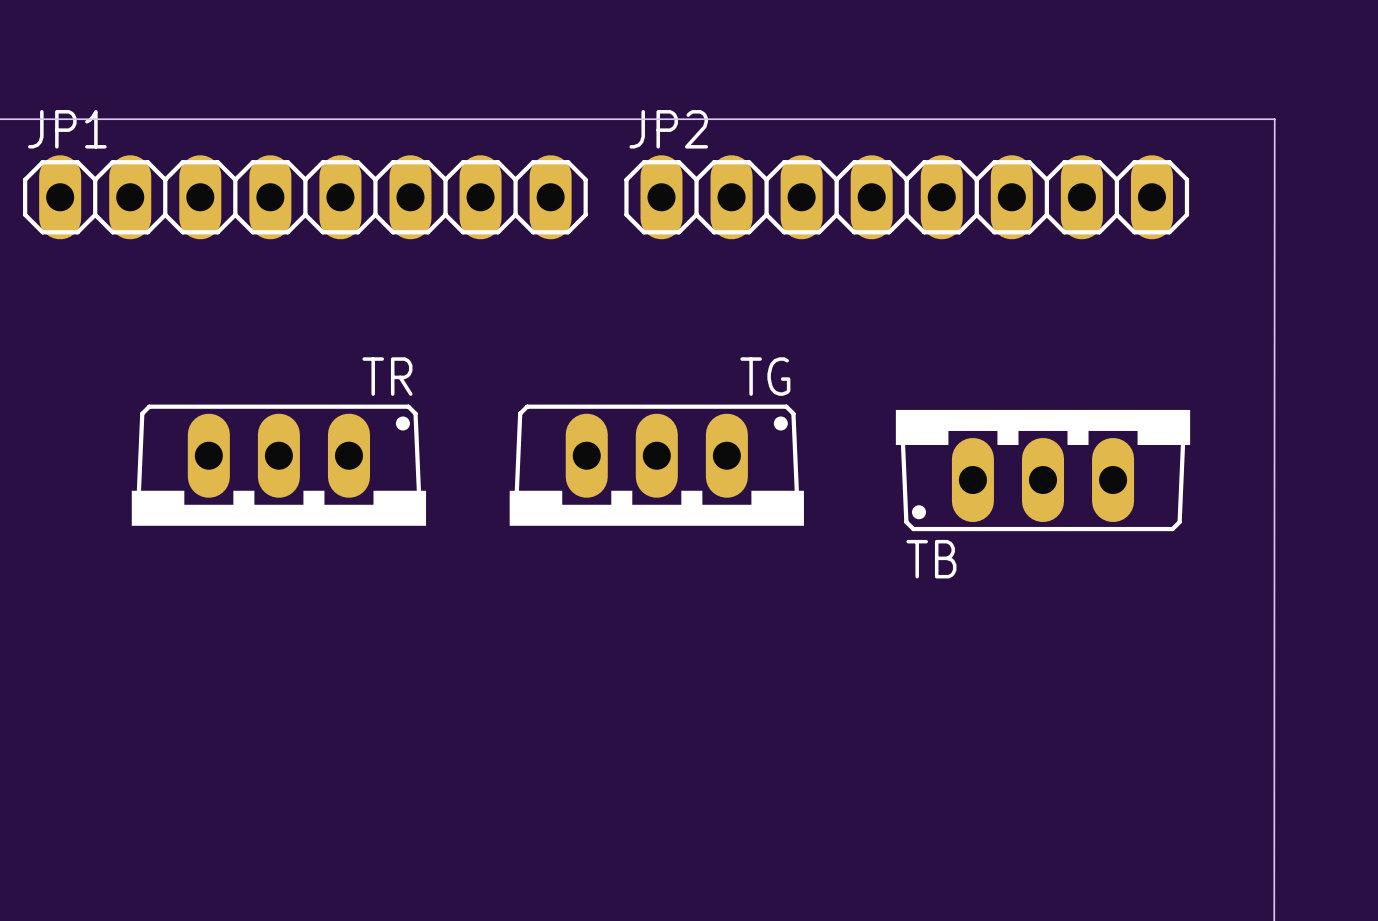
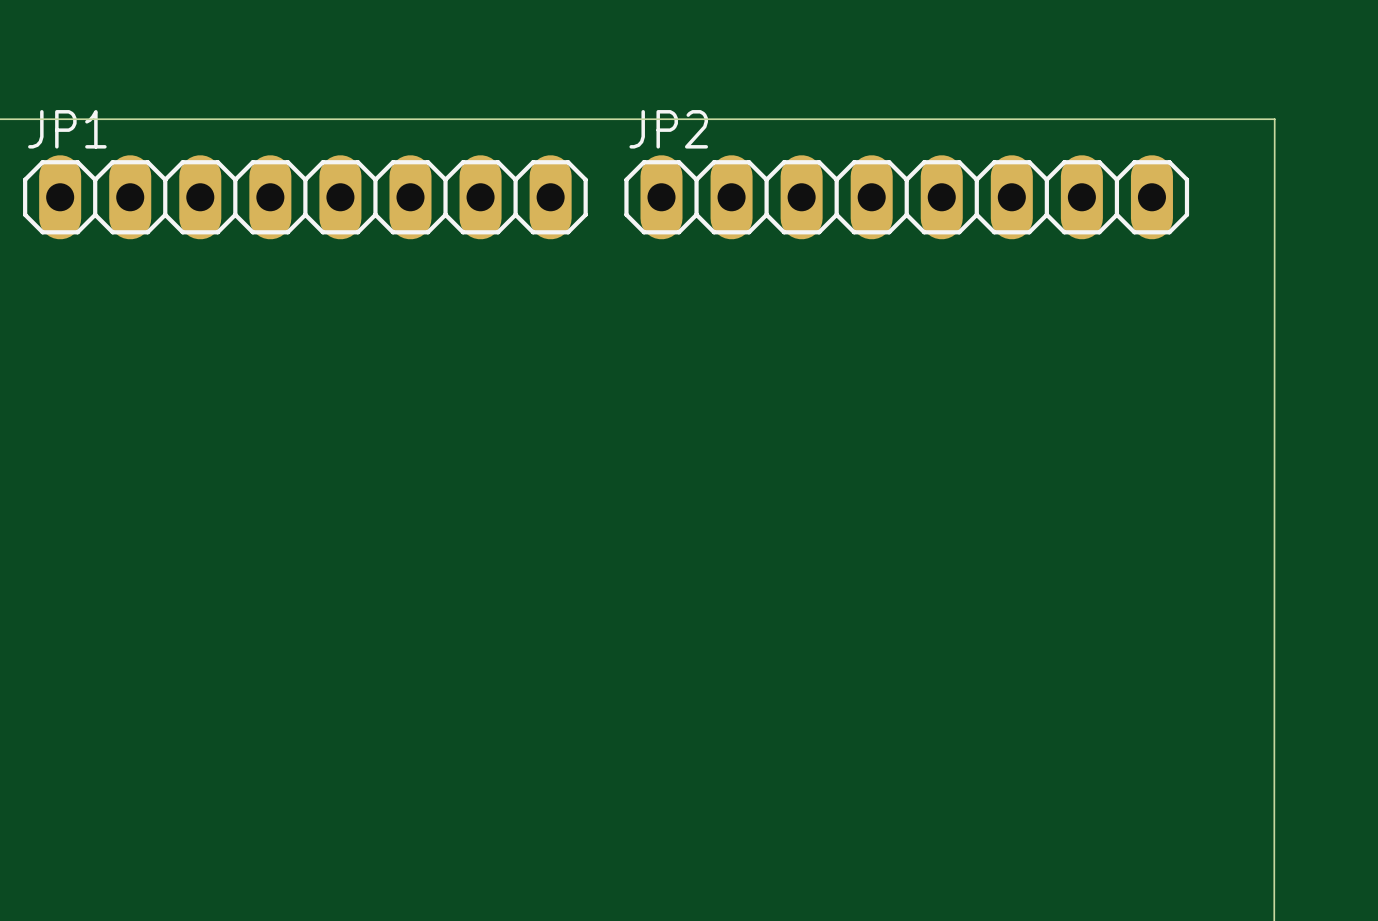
TR: (278, 465) -> none
TG: (656, 465) -> none
TB: (1042, 470) -> none

